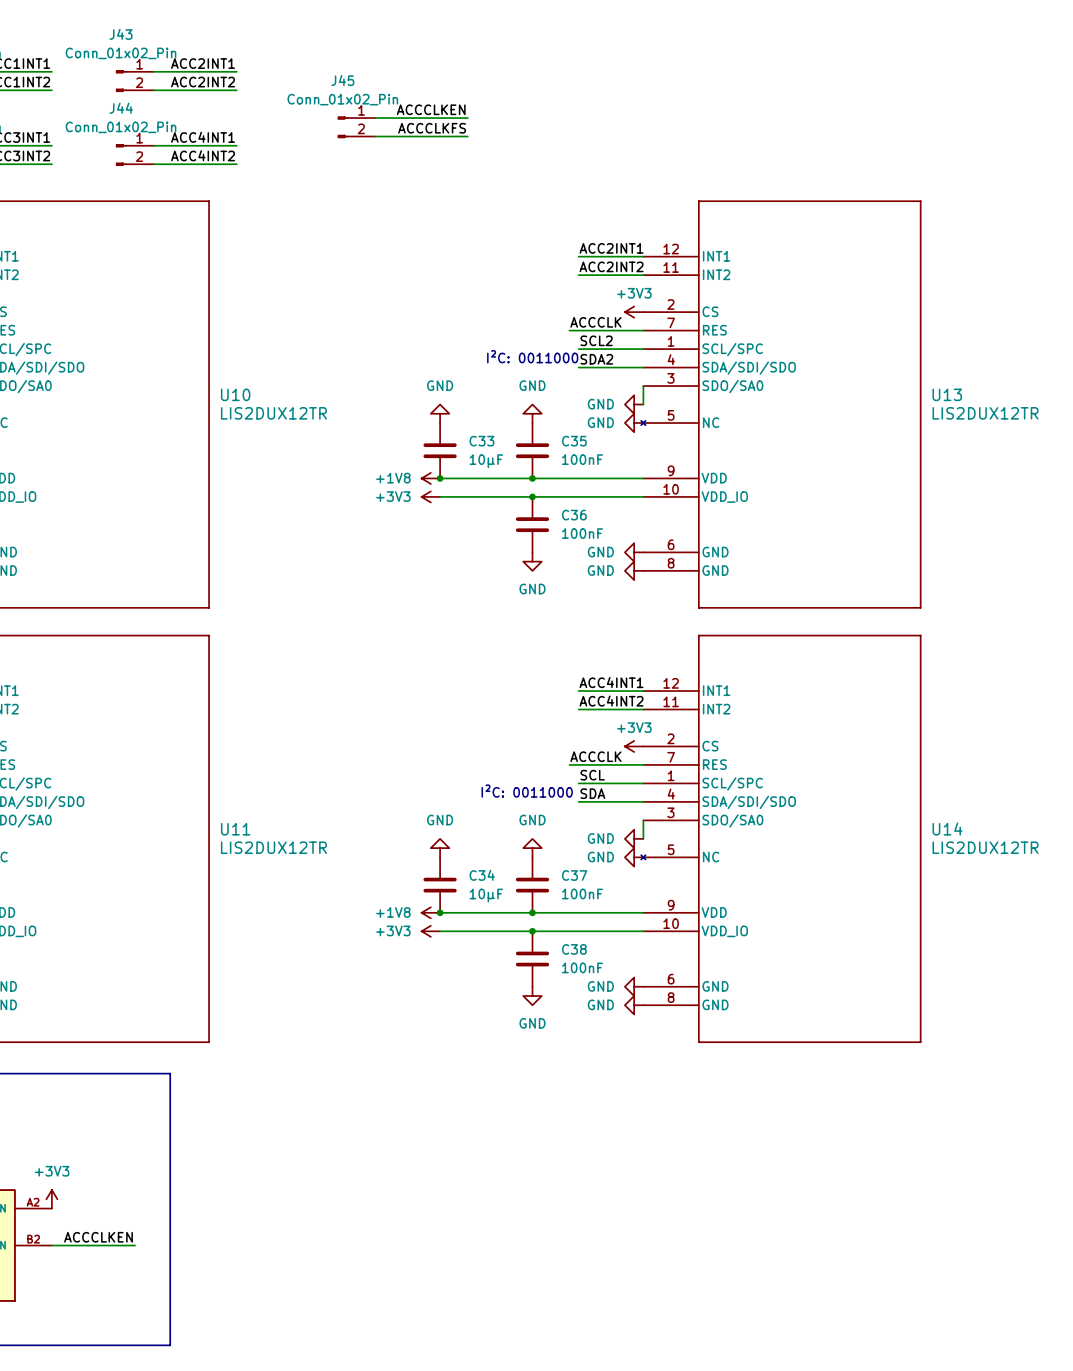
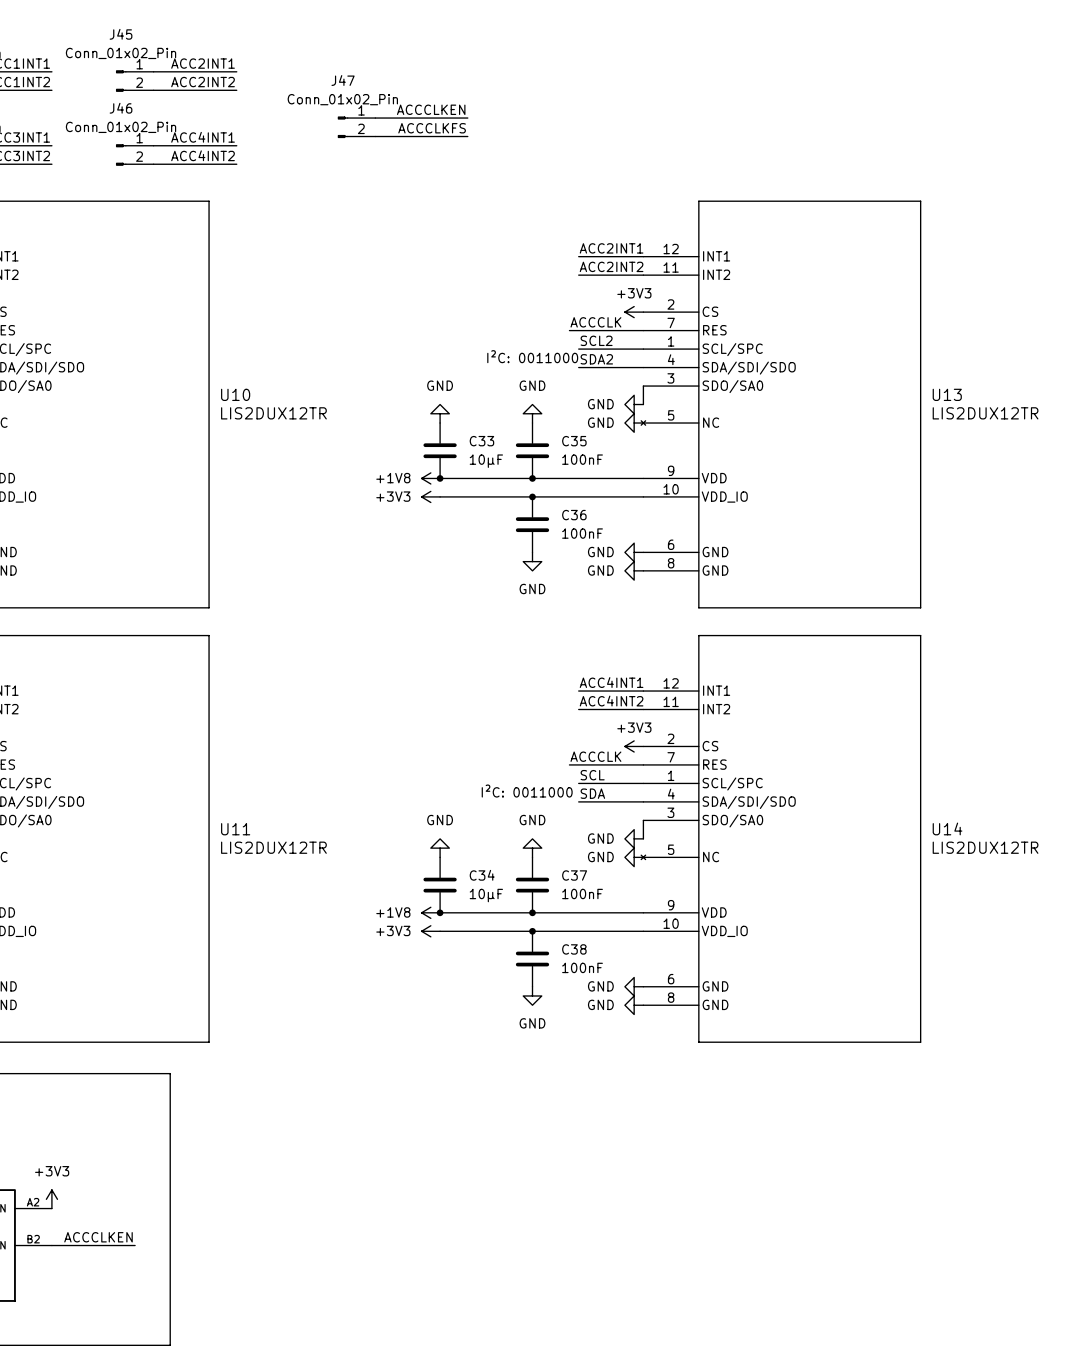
J43 name: J43 (121, 34) -> J45 (121, 34)
J45 name: J45 (342, 80) -> J47 (343, 80)
J44 name: J44 (121, 108) -> J46 (121, 108)

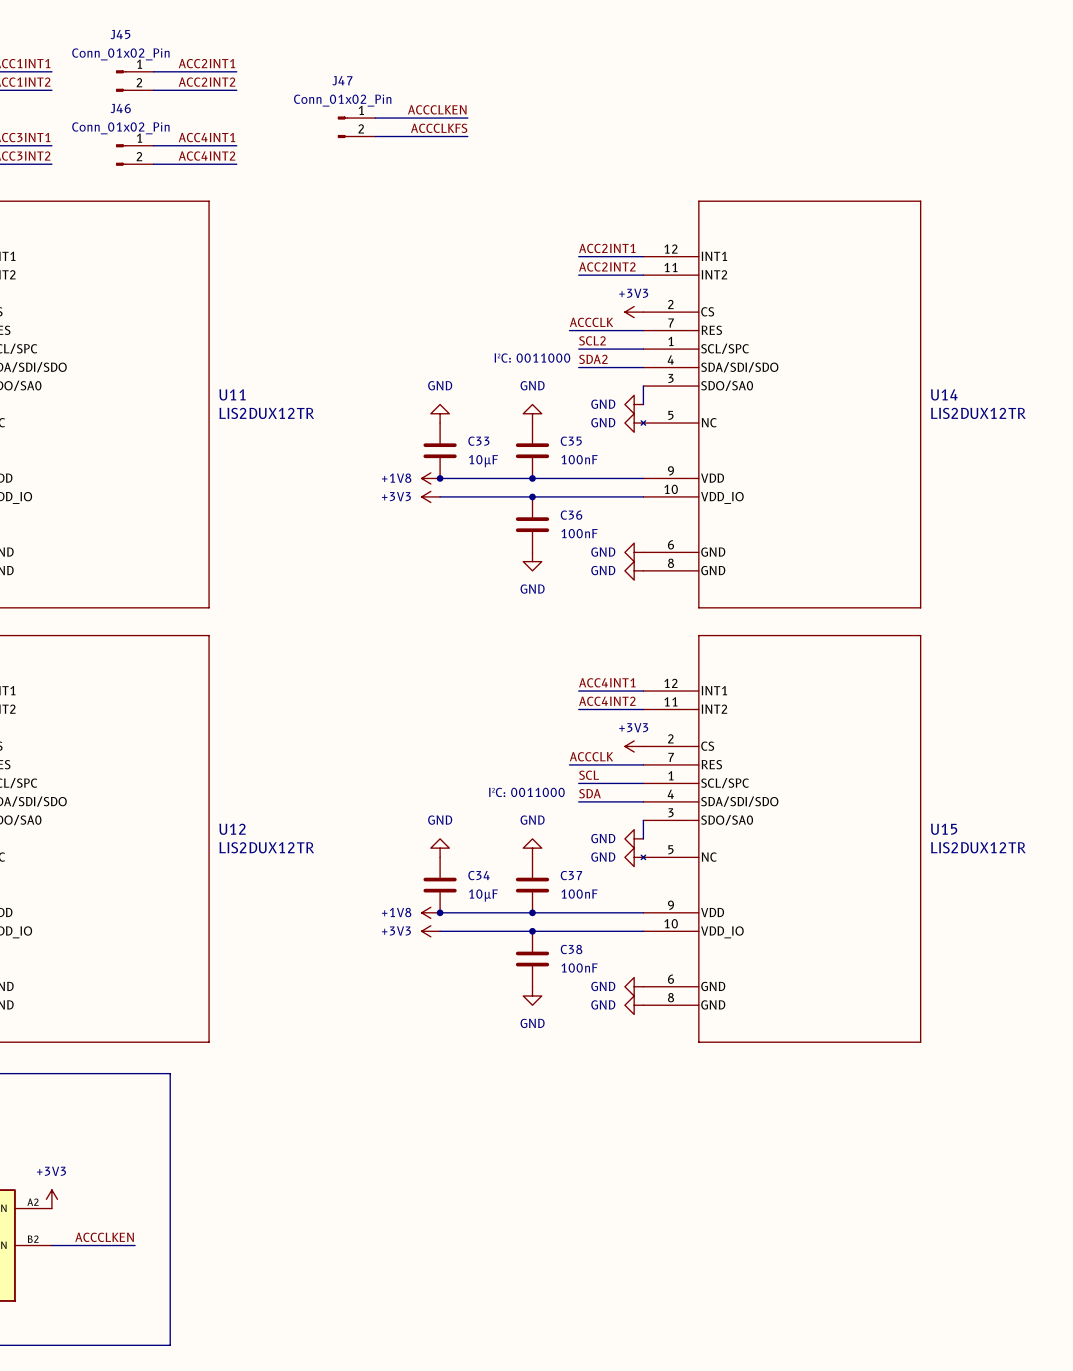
U10 name: U10 (235, 394) -> U11 (232, 394)
U13 name: U13 (947, 394) -> U14 (944, 394)
U14 name: U14 (947, 828) -> U15 (944, 829)
U11 name: U11 (235, 829) -> U12 (232, 829)

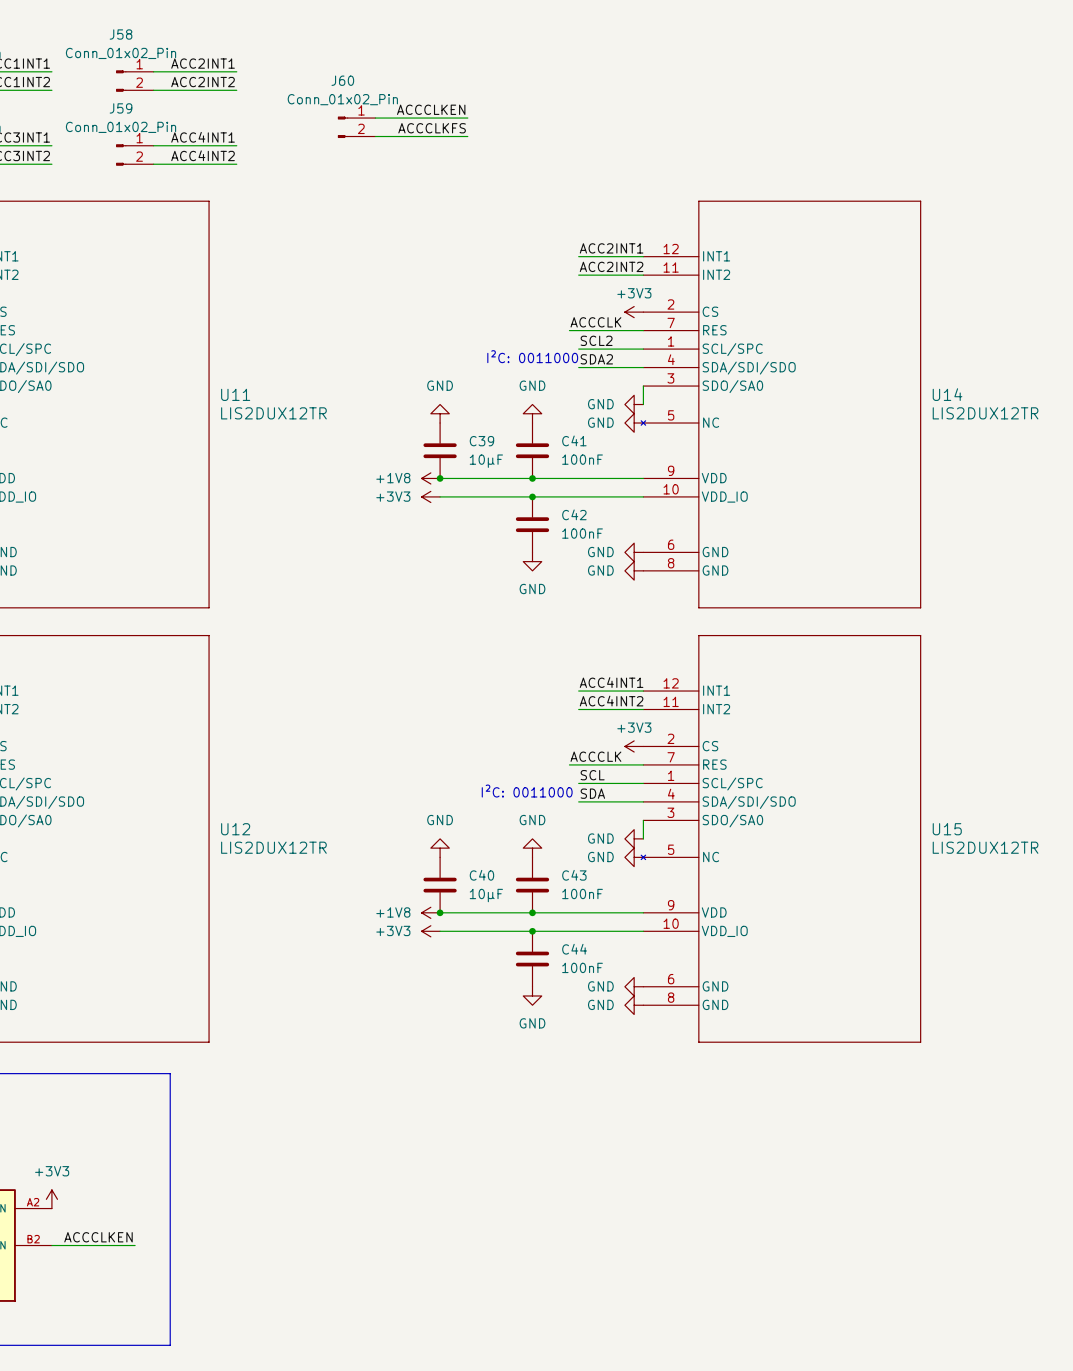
J45 name: J45 (120, 34) -> J58 (121, 34)
J47 name: J47 (342, 80) -> J60 (342, 80)
J46 name: J46 (120, 108) -> J59 (121, 108)
C33 name: C33 (478, 441) -> C39 (481, 441)
C35 name: C35 (571, 441) -> C41 (574, 440)
C36 name: C36 (571, 515) -> C42 (574, 514)
C34 name: C34 (479, 875) -> C40 (481, 875)
C37 name: C37 (571, 875) -> C43 (574, 875)
C38 name: C38 (571, 949) -> C44 (574, 949)

